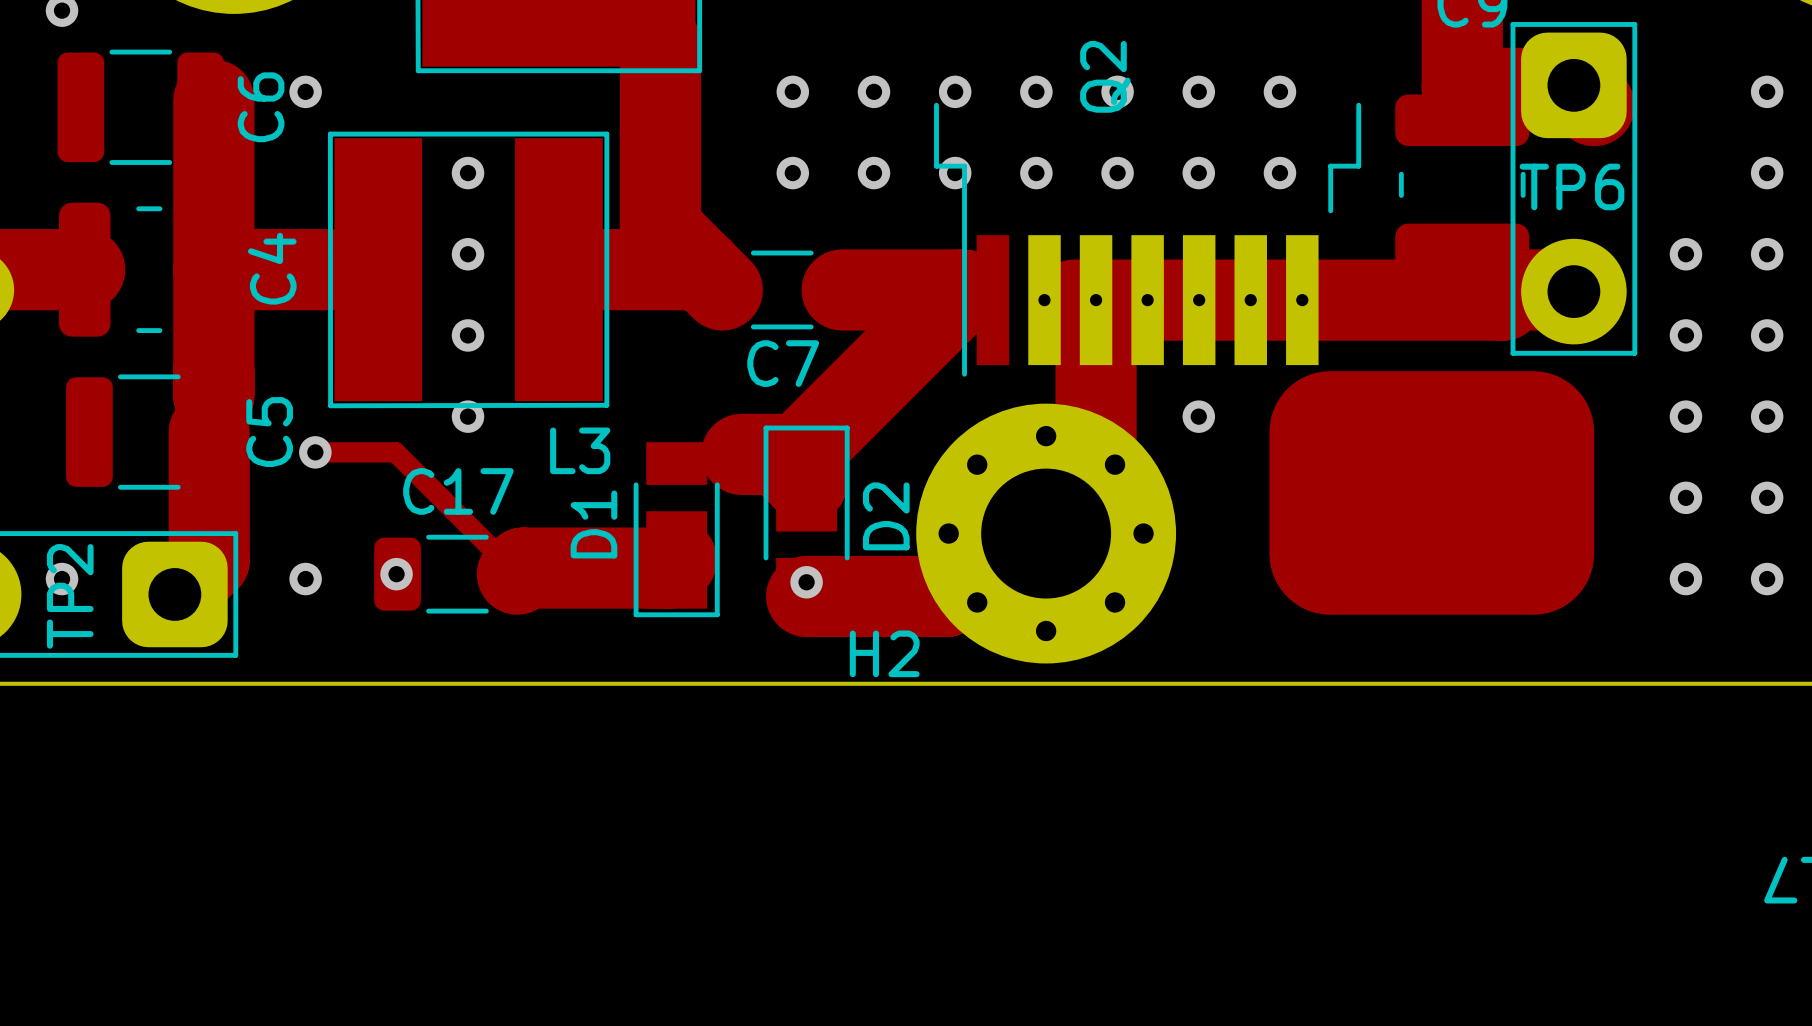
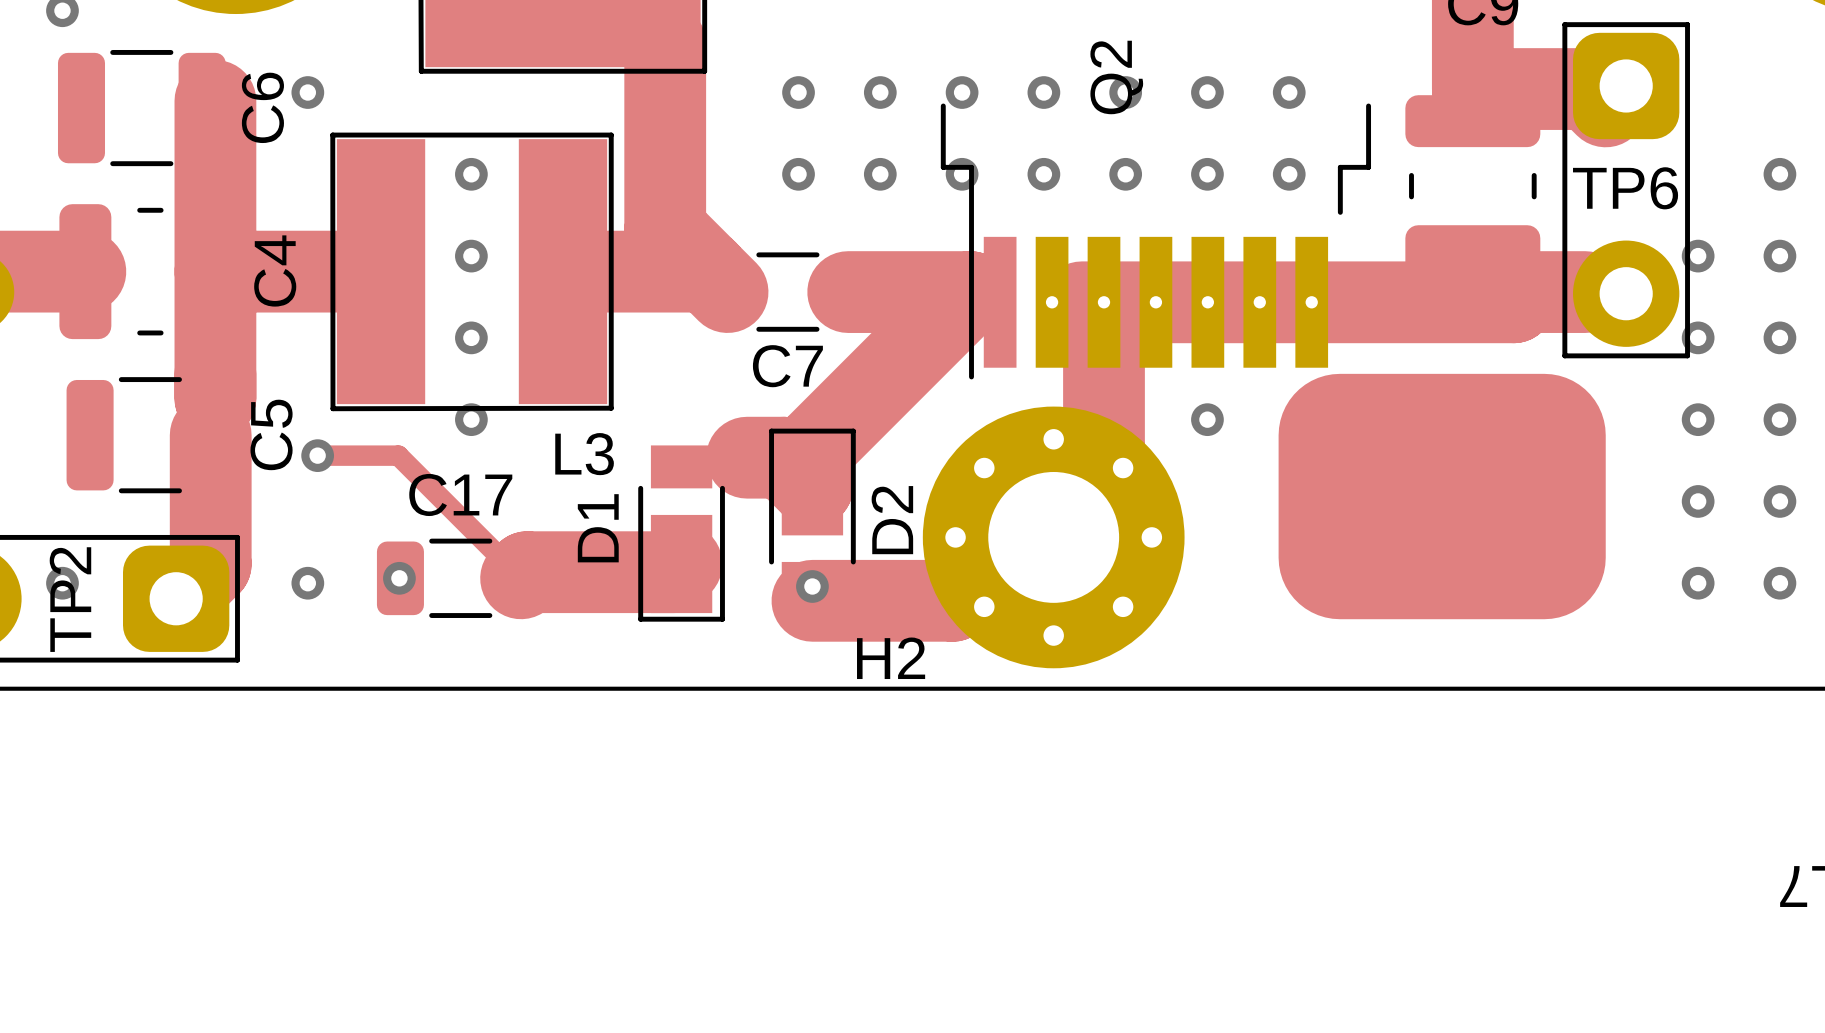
via: (1767, 91) -> none
TP6 position: (1573, 188) -> (1626, 190)

